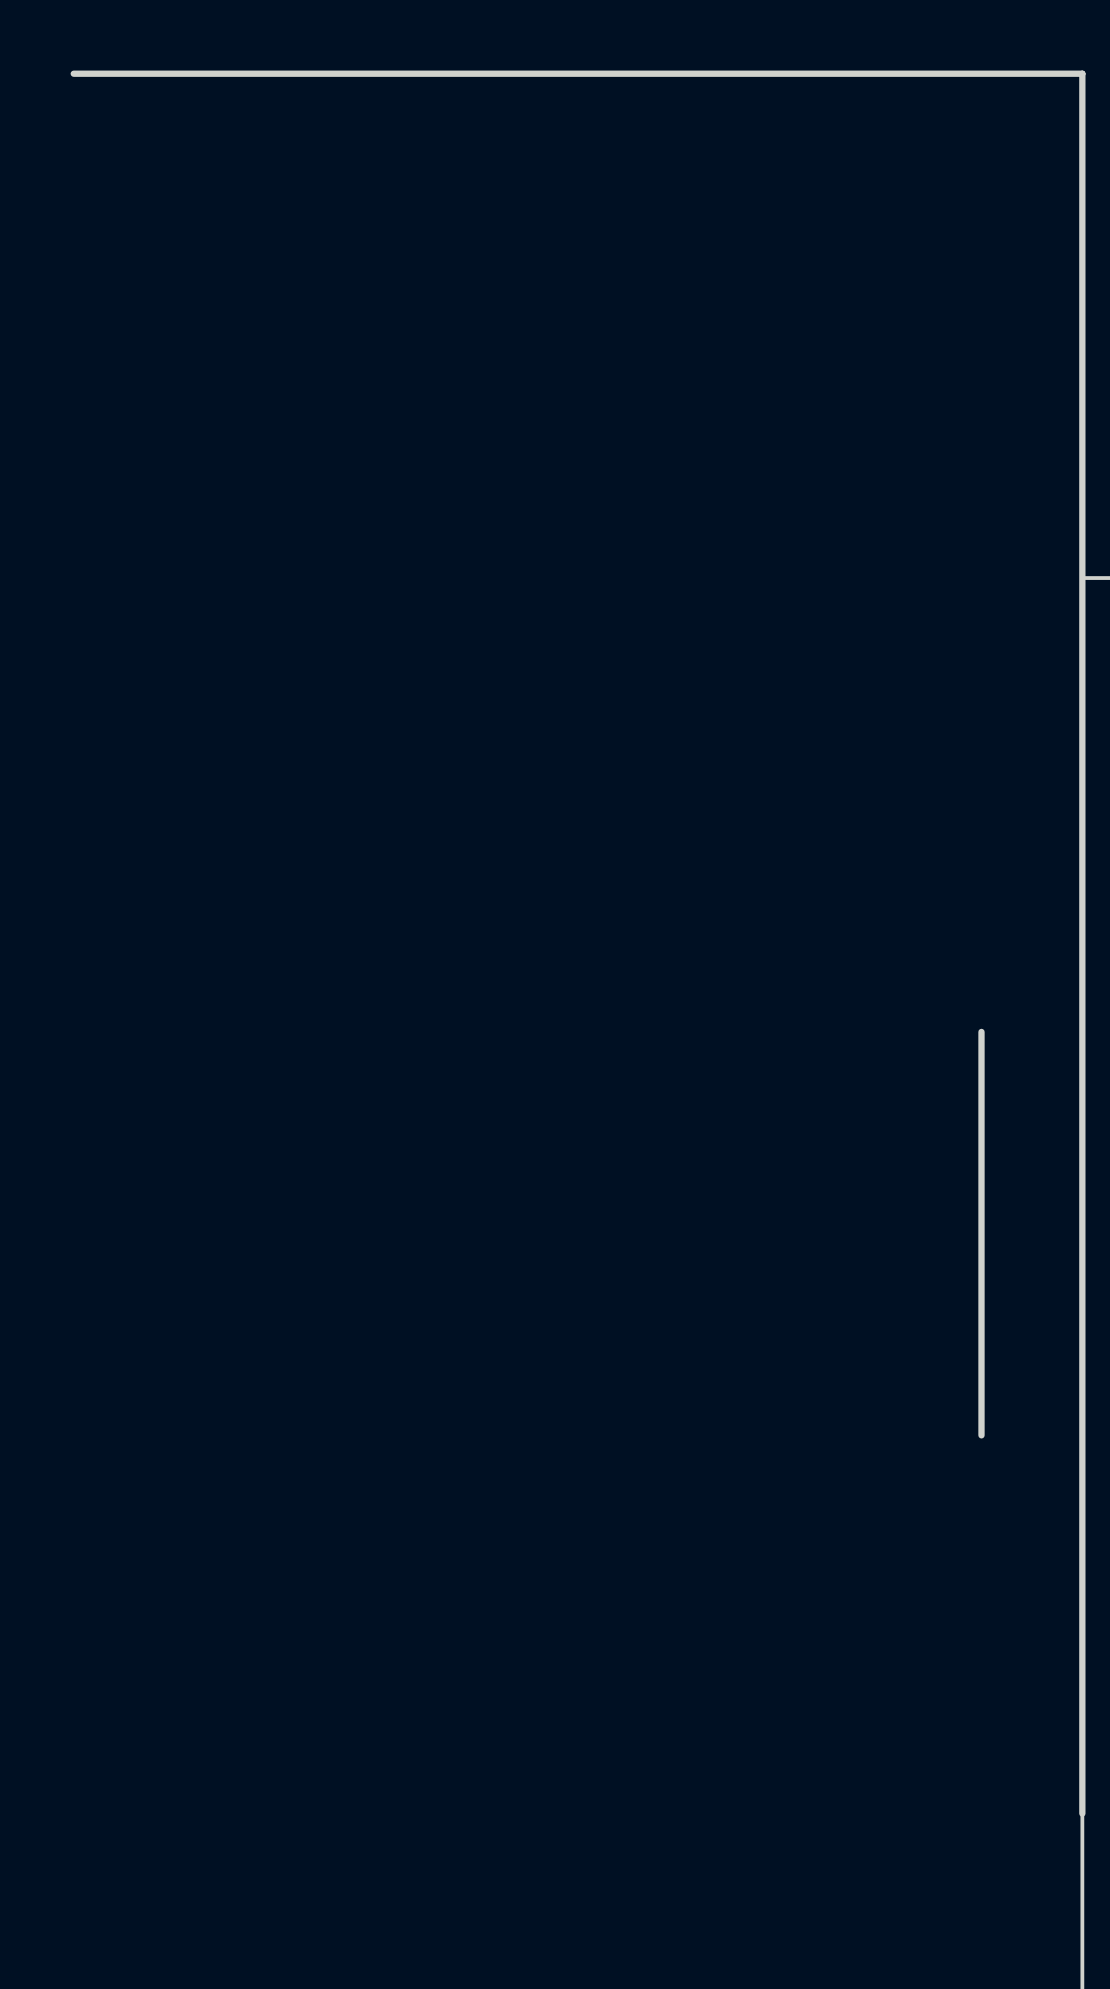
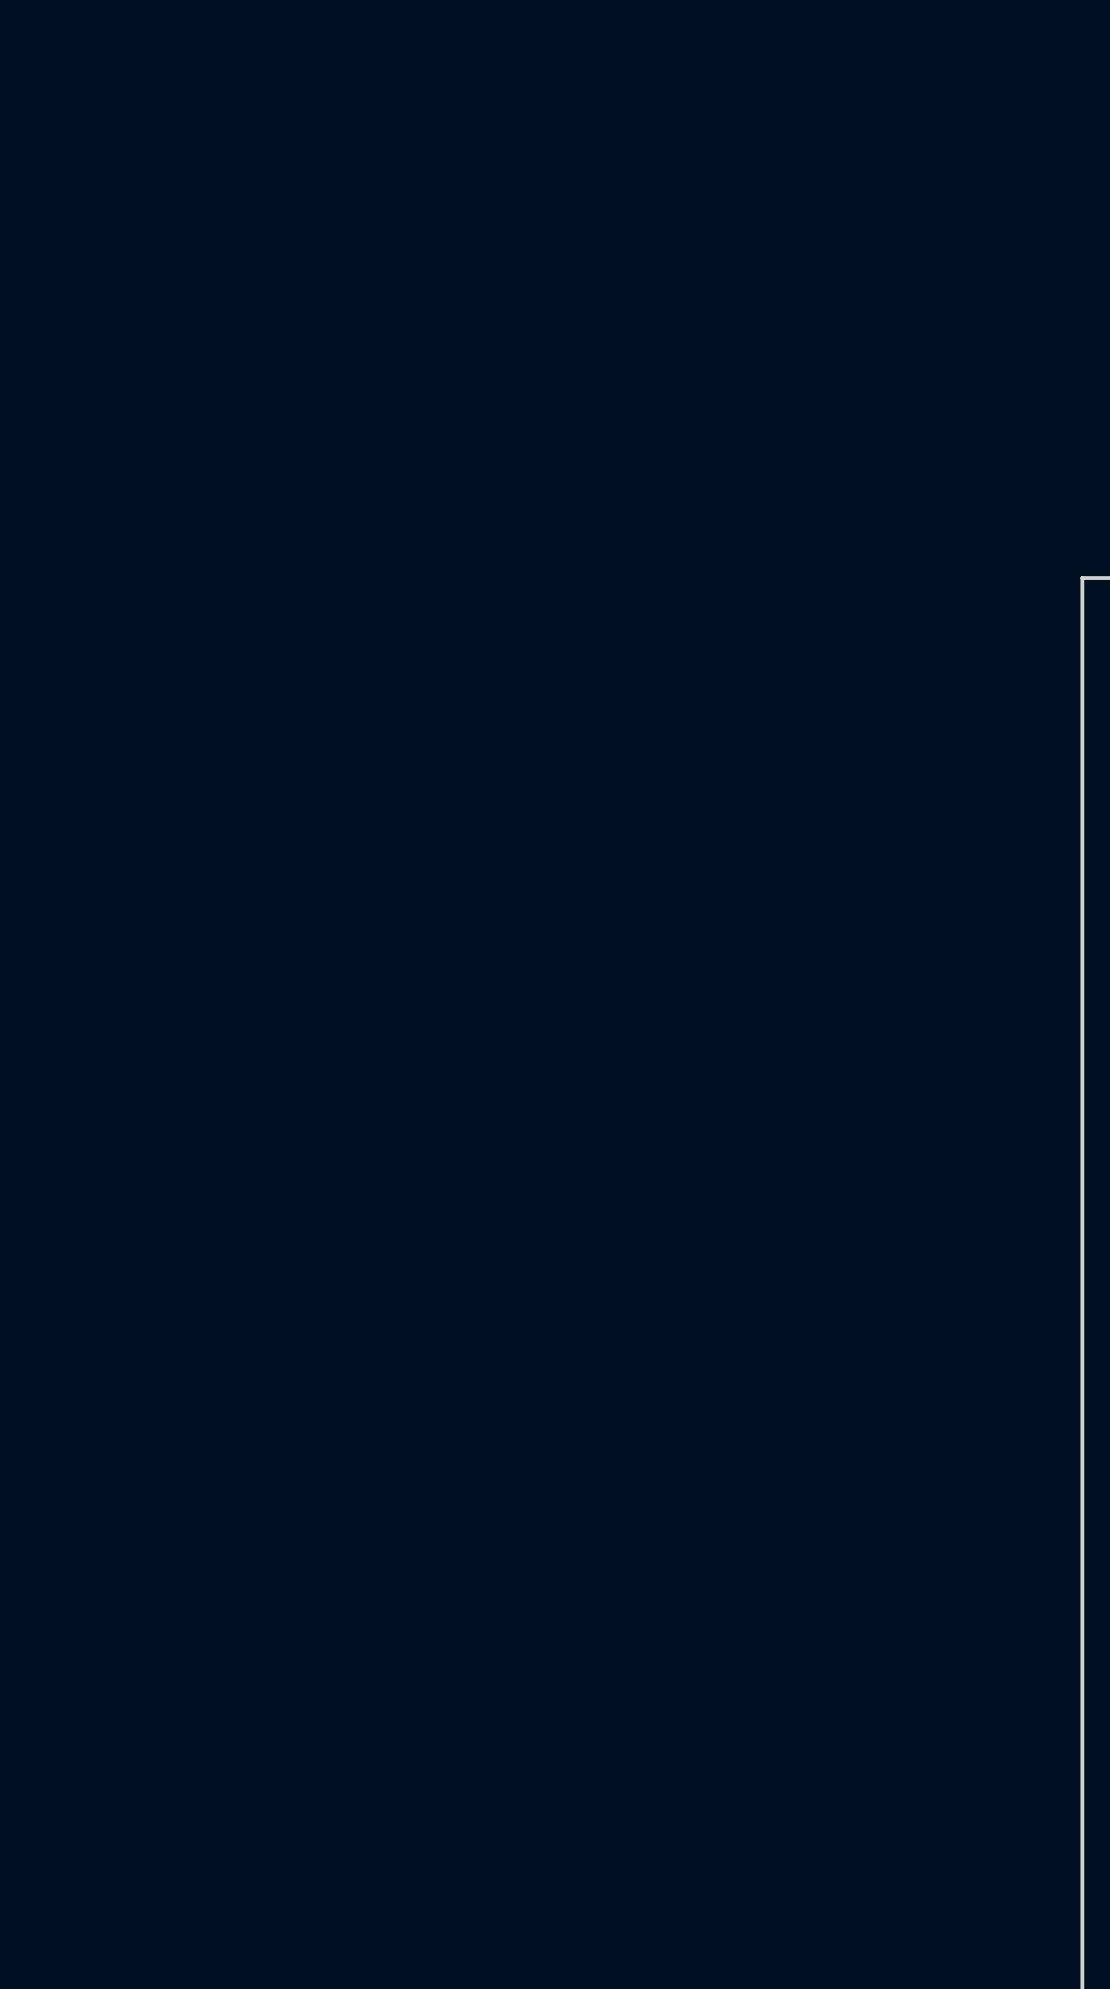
board edge: (73, 73) (1082, 73) (1082, 1813) -> none
board edge: (981, 1031) (981, 1435) -> none

